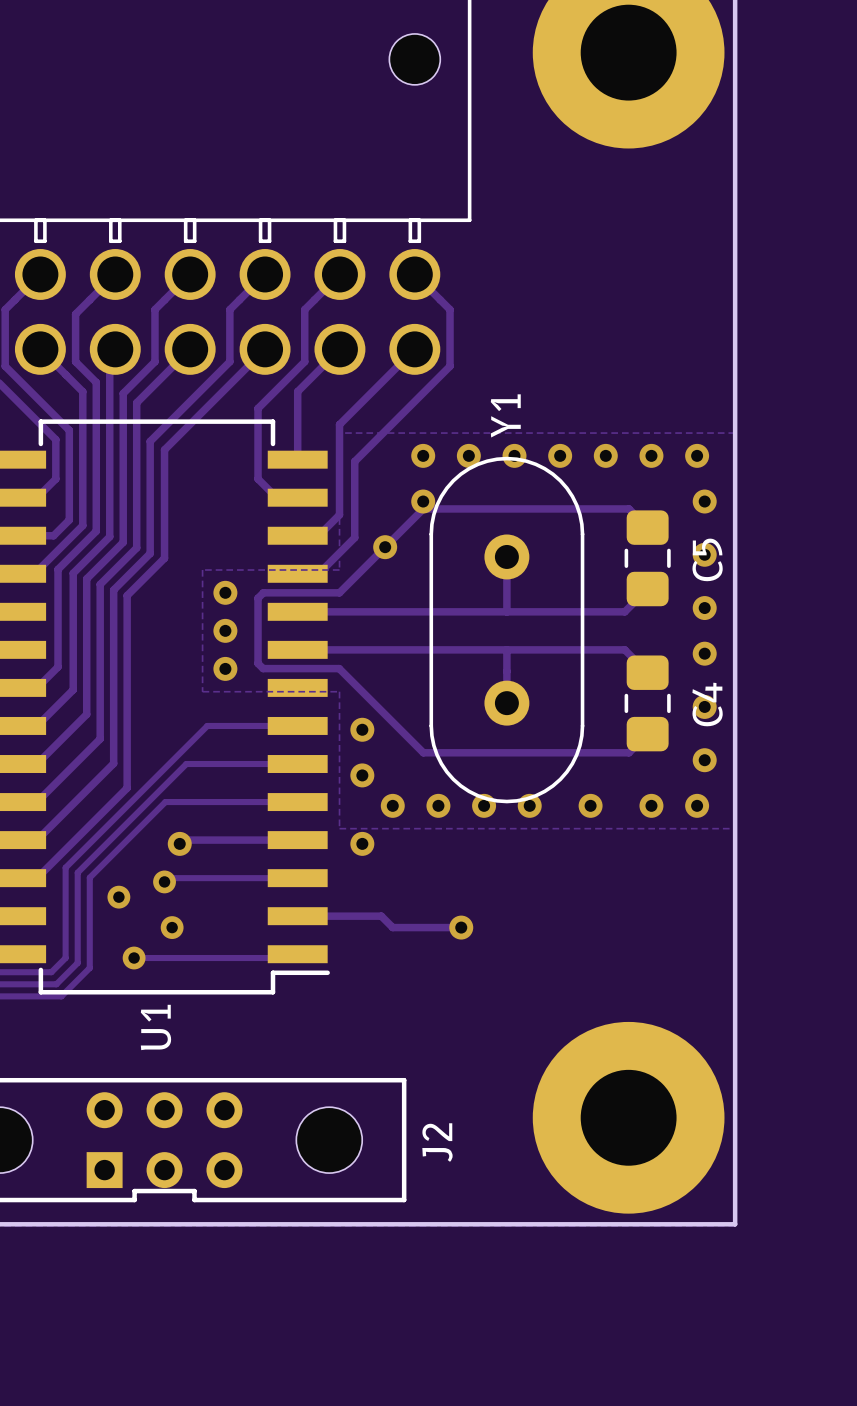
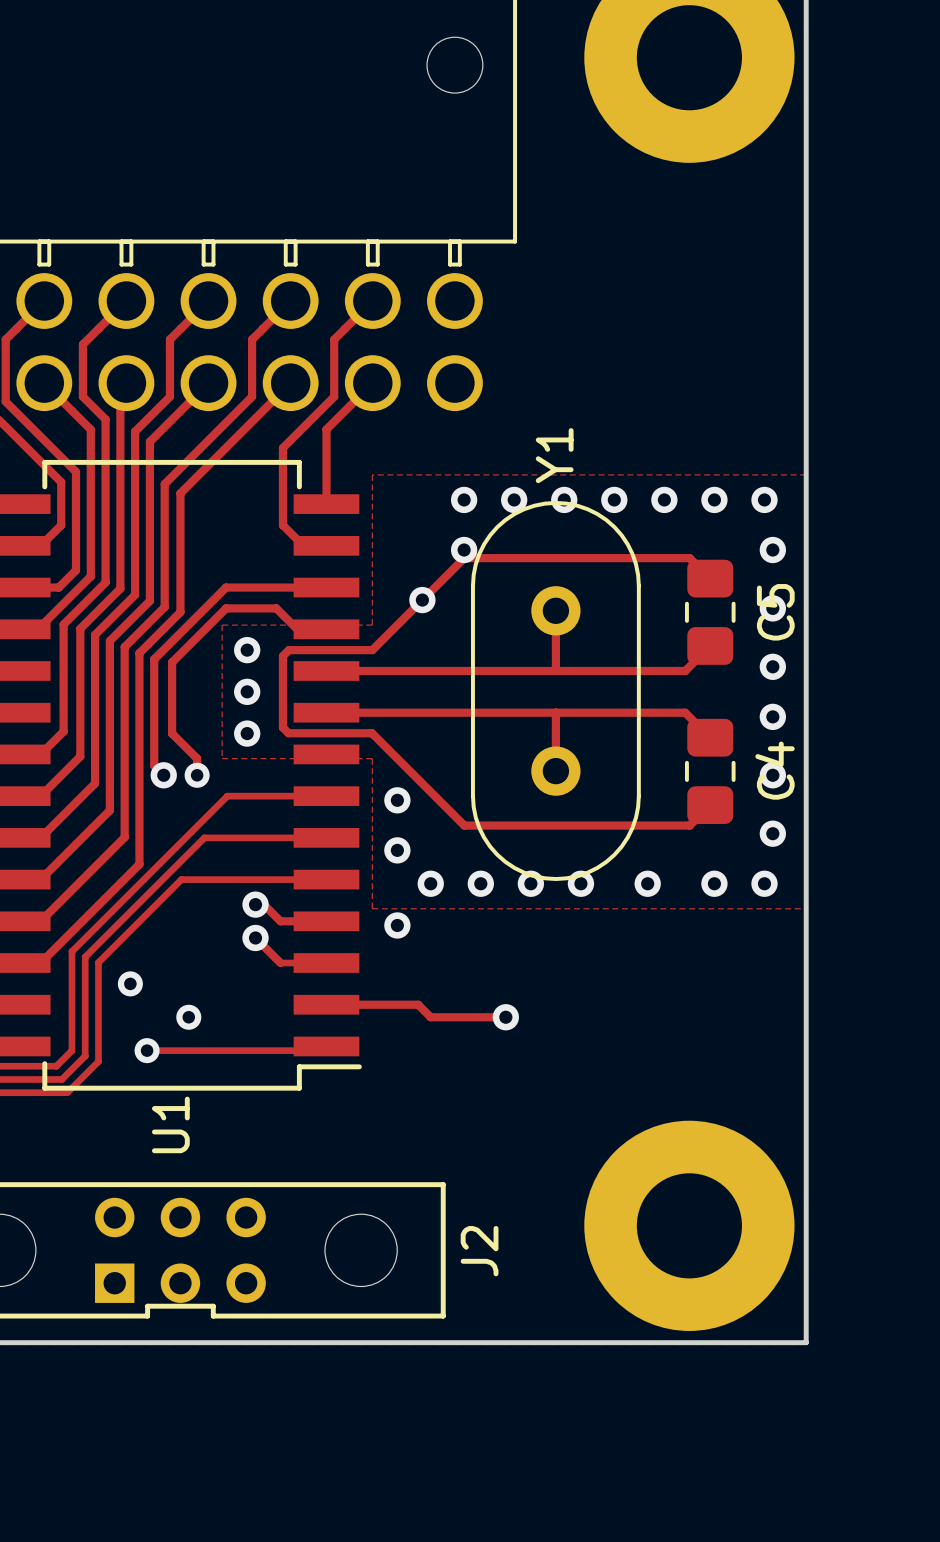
track: (414, 274) (450, 309) (450, 366) (354, 461) (354, 537) (318, 573) -> none
track: (414, 349) (339, 424) (339, 514) (318, 535) -> none
track: none -> (326, 587) (226, 587) (154, 659) (154, 765) (163, 775)
track: none -> (326, 629) (297, 629) (276, 608) (226, 608) (172, 662) (172, 733) (197, 758) (197, 775)
via: none -> (163, 775)
via: none -> (255, 904)
track: (255, 840) (183, 840) (179, 843) -> (280, 921) (263, 904) (255, 904)
via: (179, 843) -> none
via: none -> (255, 937)
track: (255, 878) (168, 878) (164, 881) -> (280, 963) (255, 937)
via position: (164, 881) -> (197, 775)

